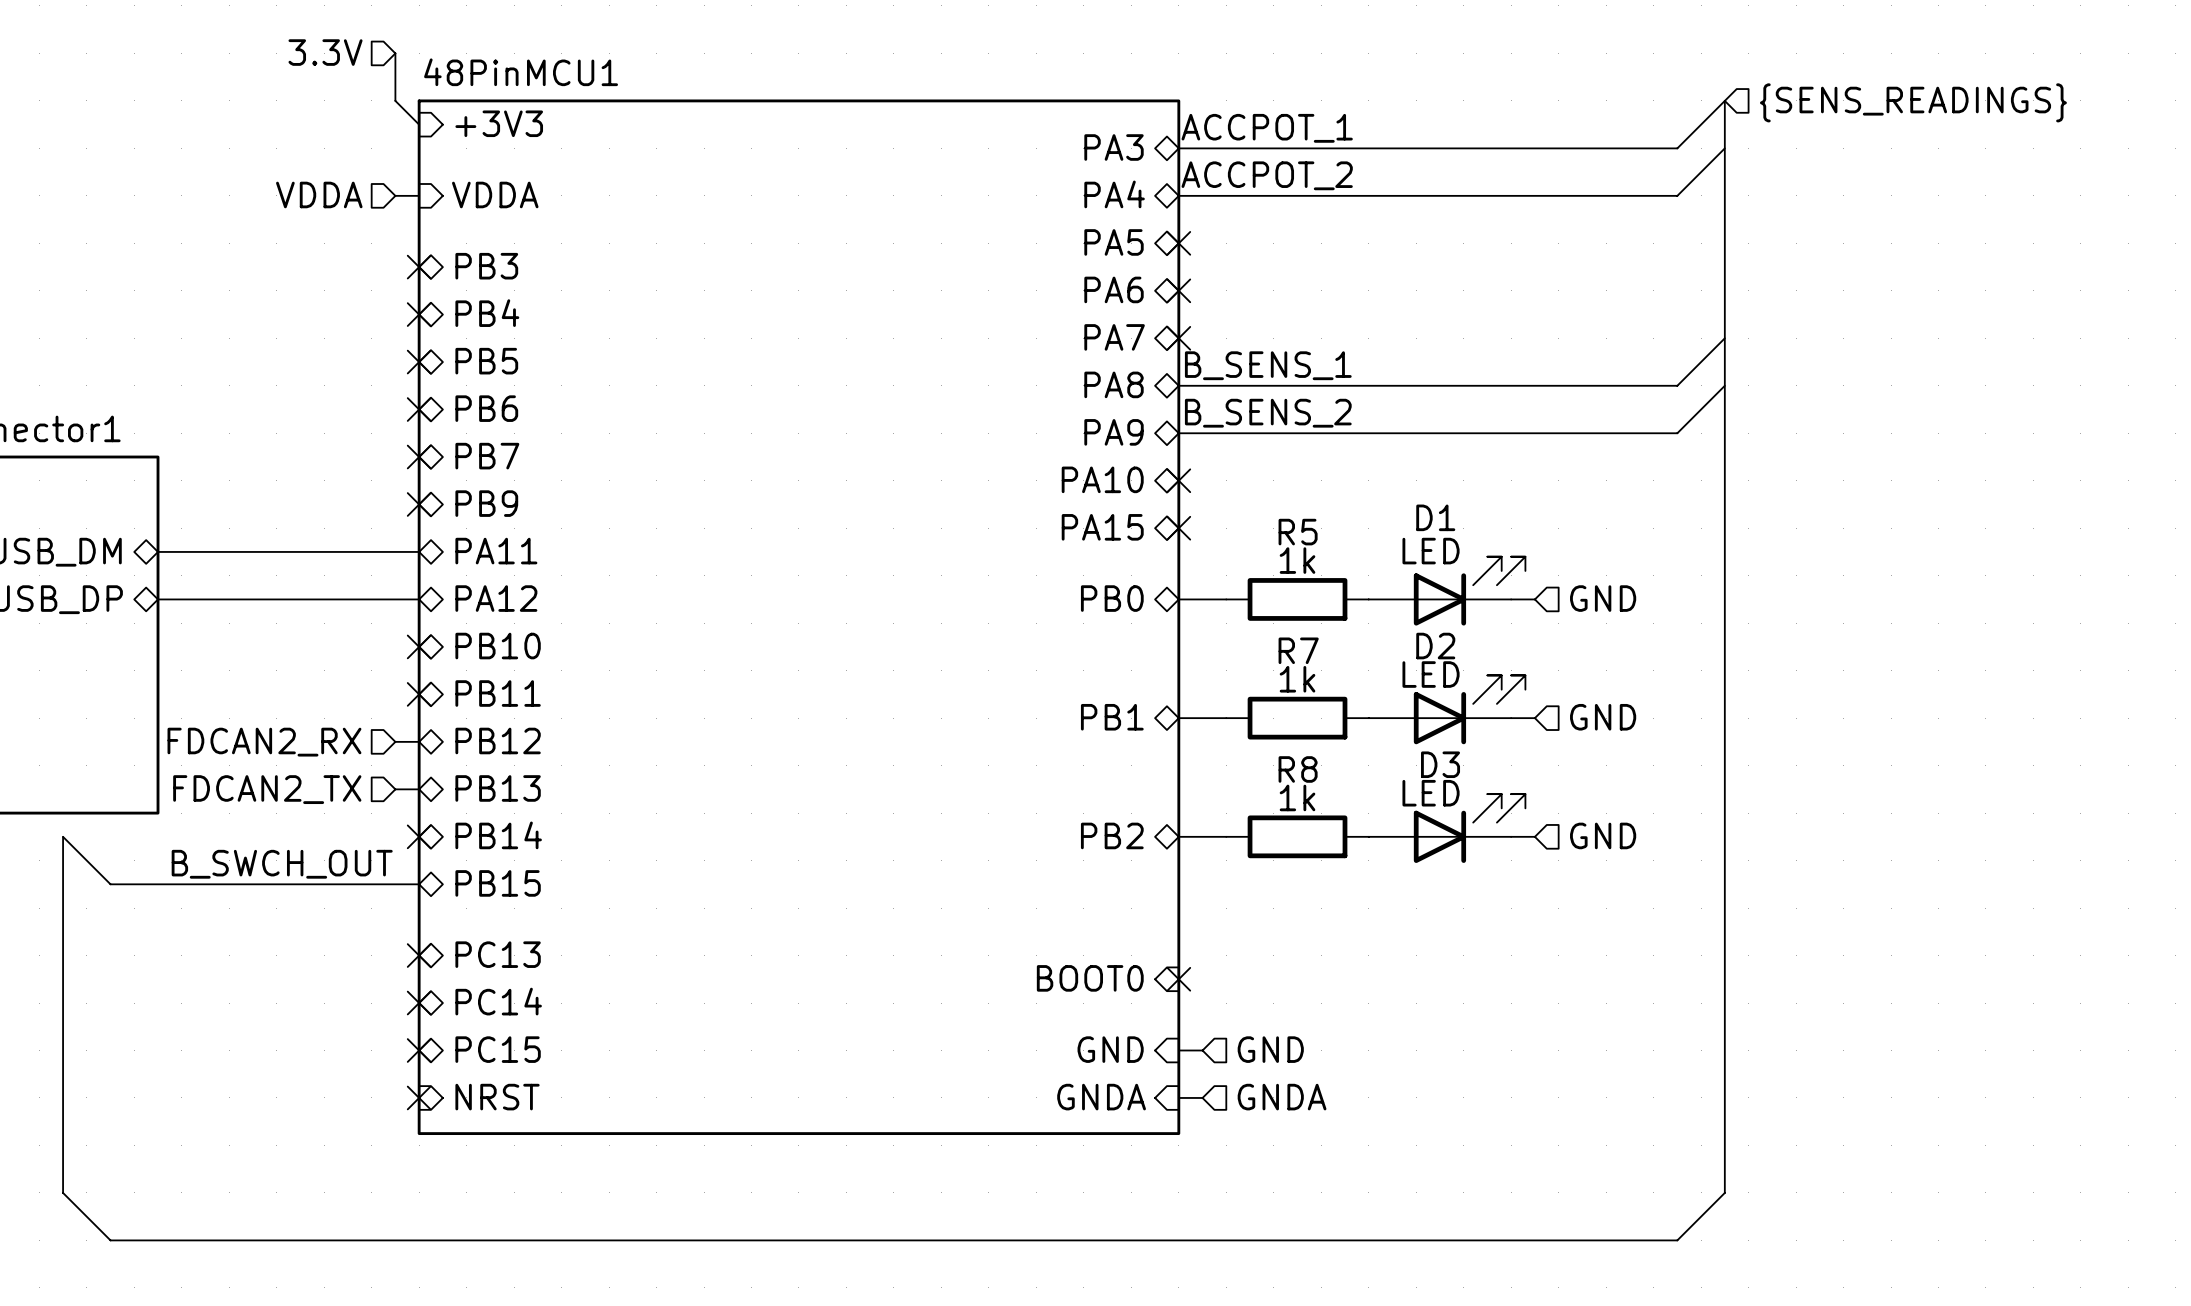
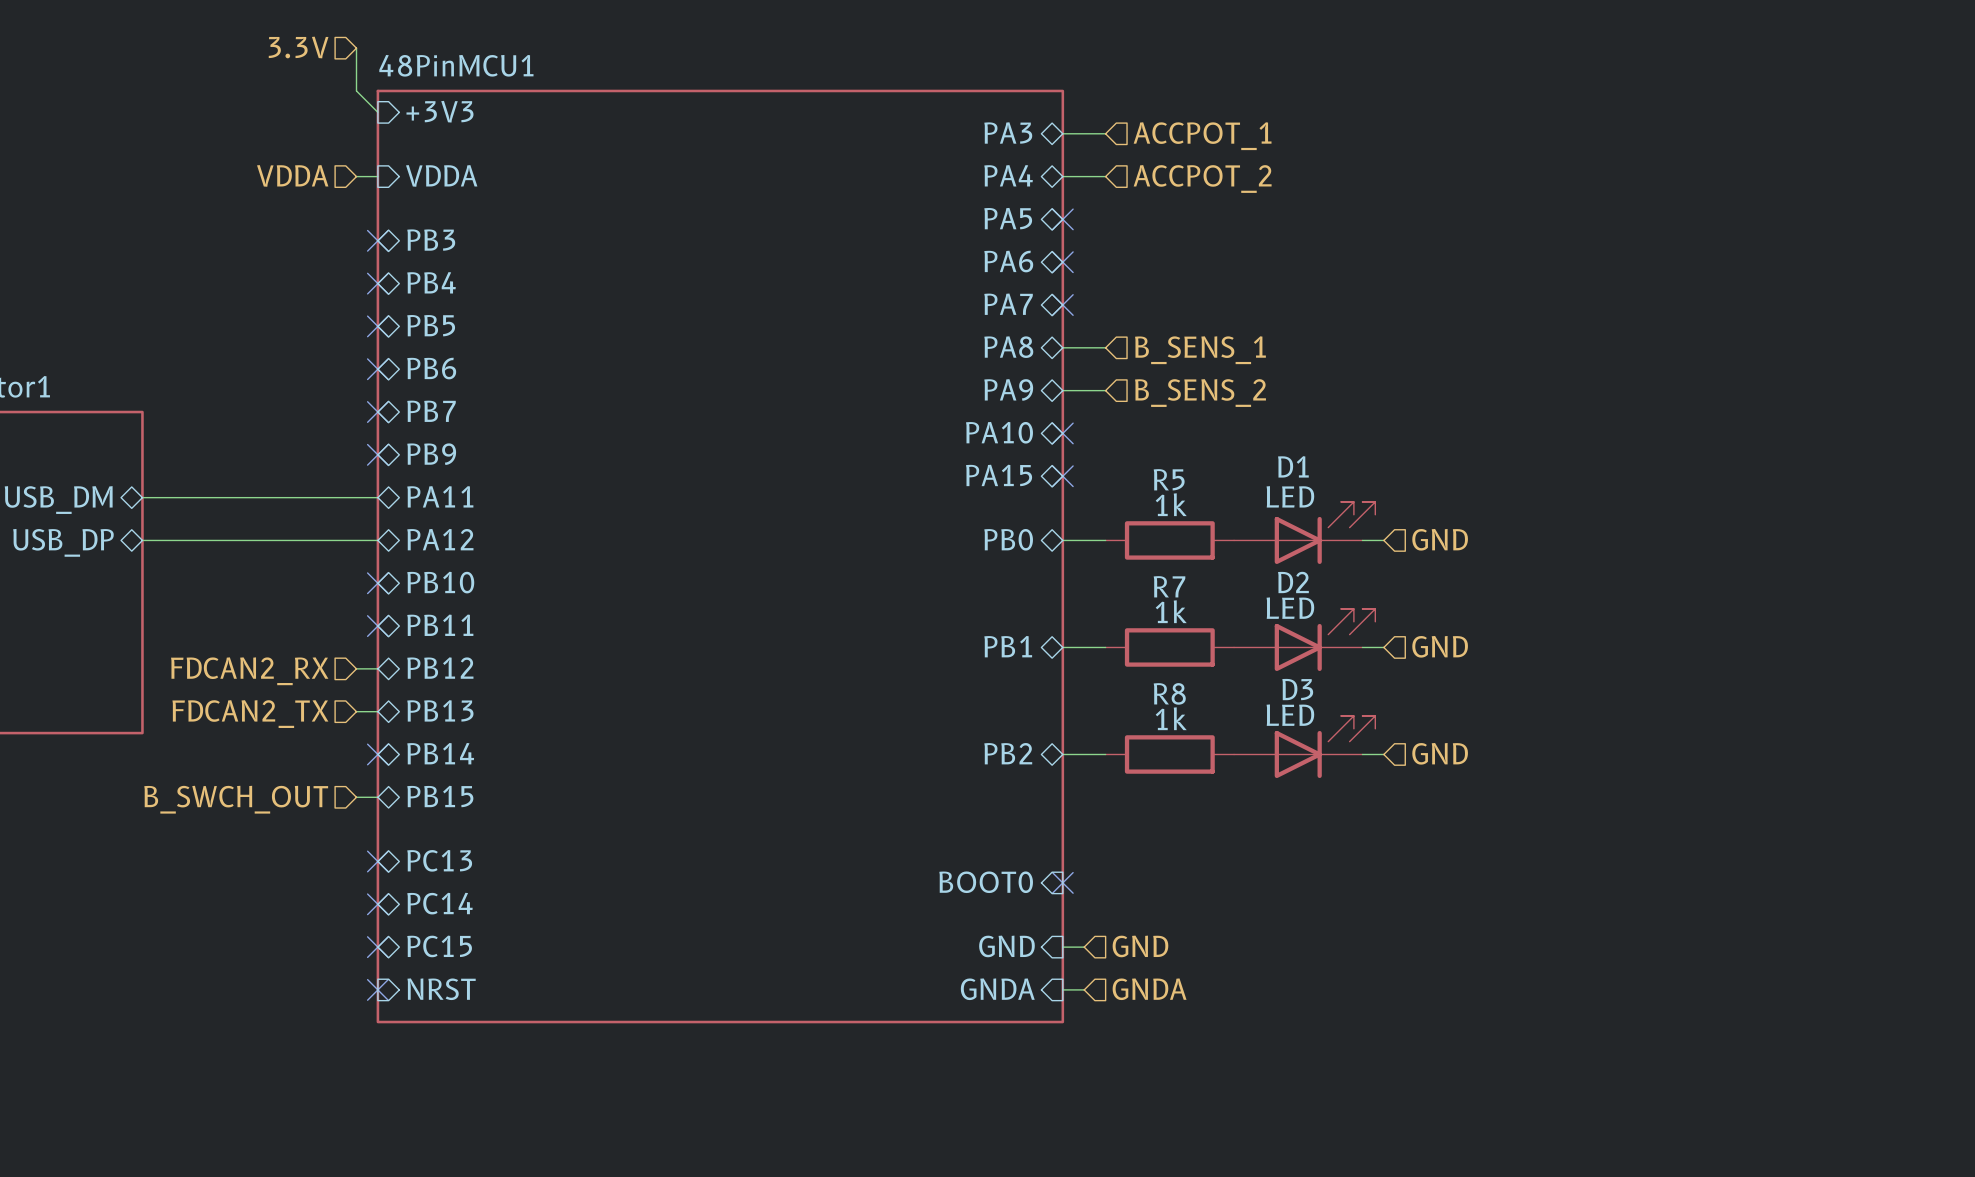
wire: (1724, 100) (1677, 148) (1226, 148) -> none
bus: (1724, 100) (1724, 1192) (1677, 1240) (110, 1240) (63, 1192) (63, 836) -> none
hierarchical label: {SENS_READINGS} (1913, 102) -> none
label: ACCPOT_1 (1267, 128) -> none
hierarchical label: none -> ACCPOT_1 (1202, 136)
wire: (1724, 148) (1677, 195) (1226, 195) -> none
label: ACCPOT_2 (1267, 175) -> none
hierarchical label: none -> ACCPOT_2 (1202, 178)
wire: (1724, 338) (1677, 385) (1226, 385) -> none
label: B_SENS_1 (1268, 365) -> none
wire: (1724, 385) (1677, 433) (1226, 433) -> none
hierarchical label: none -> B_SENS_1 (1200, 350)
label: B_SENS_2 (1268, 413) -> none
hierarchical label: none -> B_SENS_2 (1200, 393)
wire: (63, 836) (110, 884) (395, 884) -> none
label: B_SWCH_OUT (282, 864) -> none
hierarchical label: none -> B_SWCH_OUT (236, 799)

